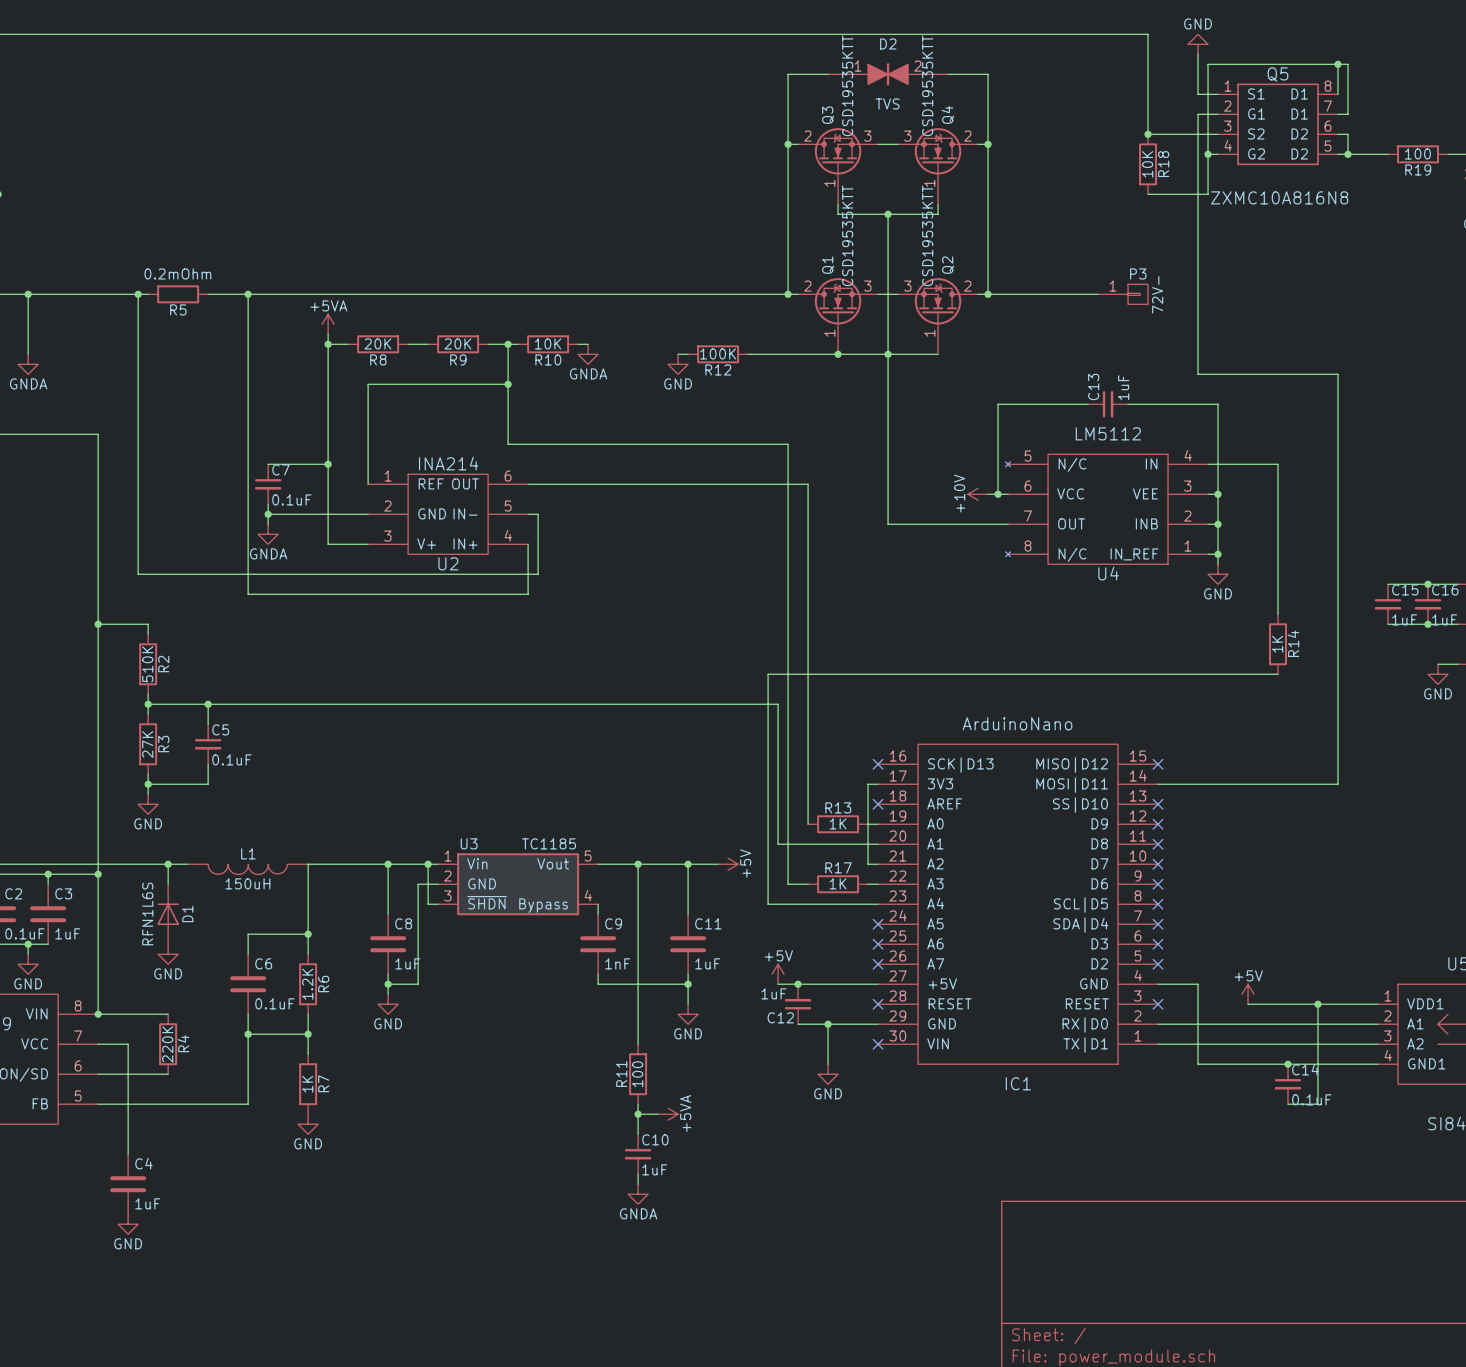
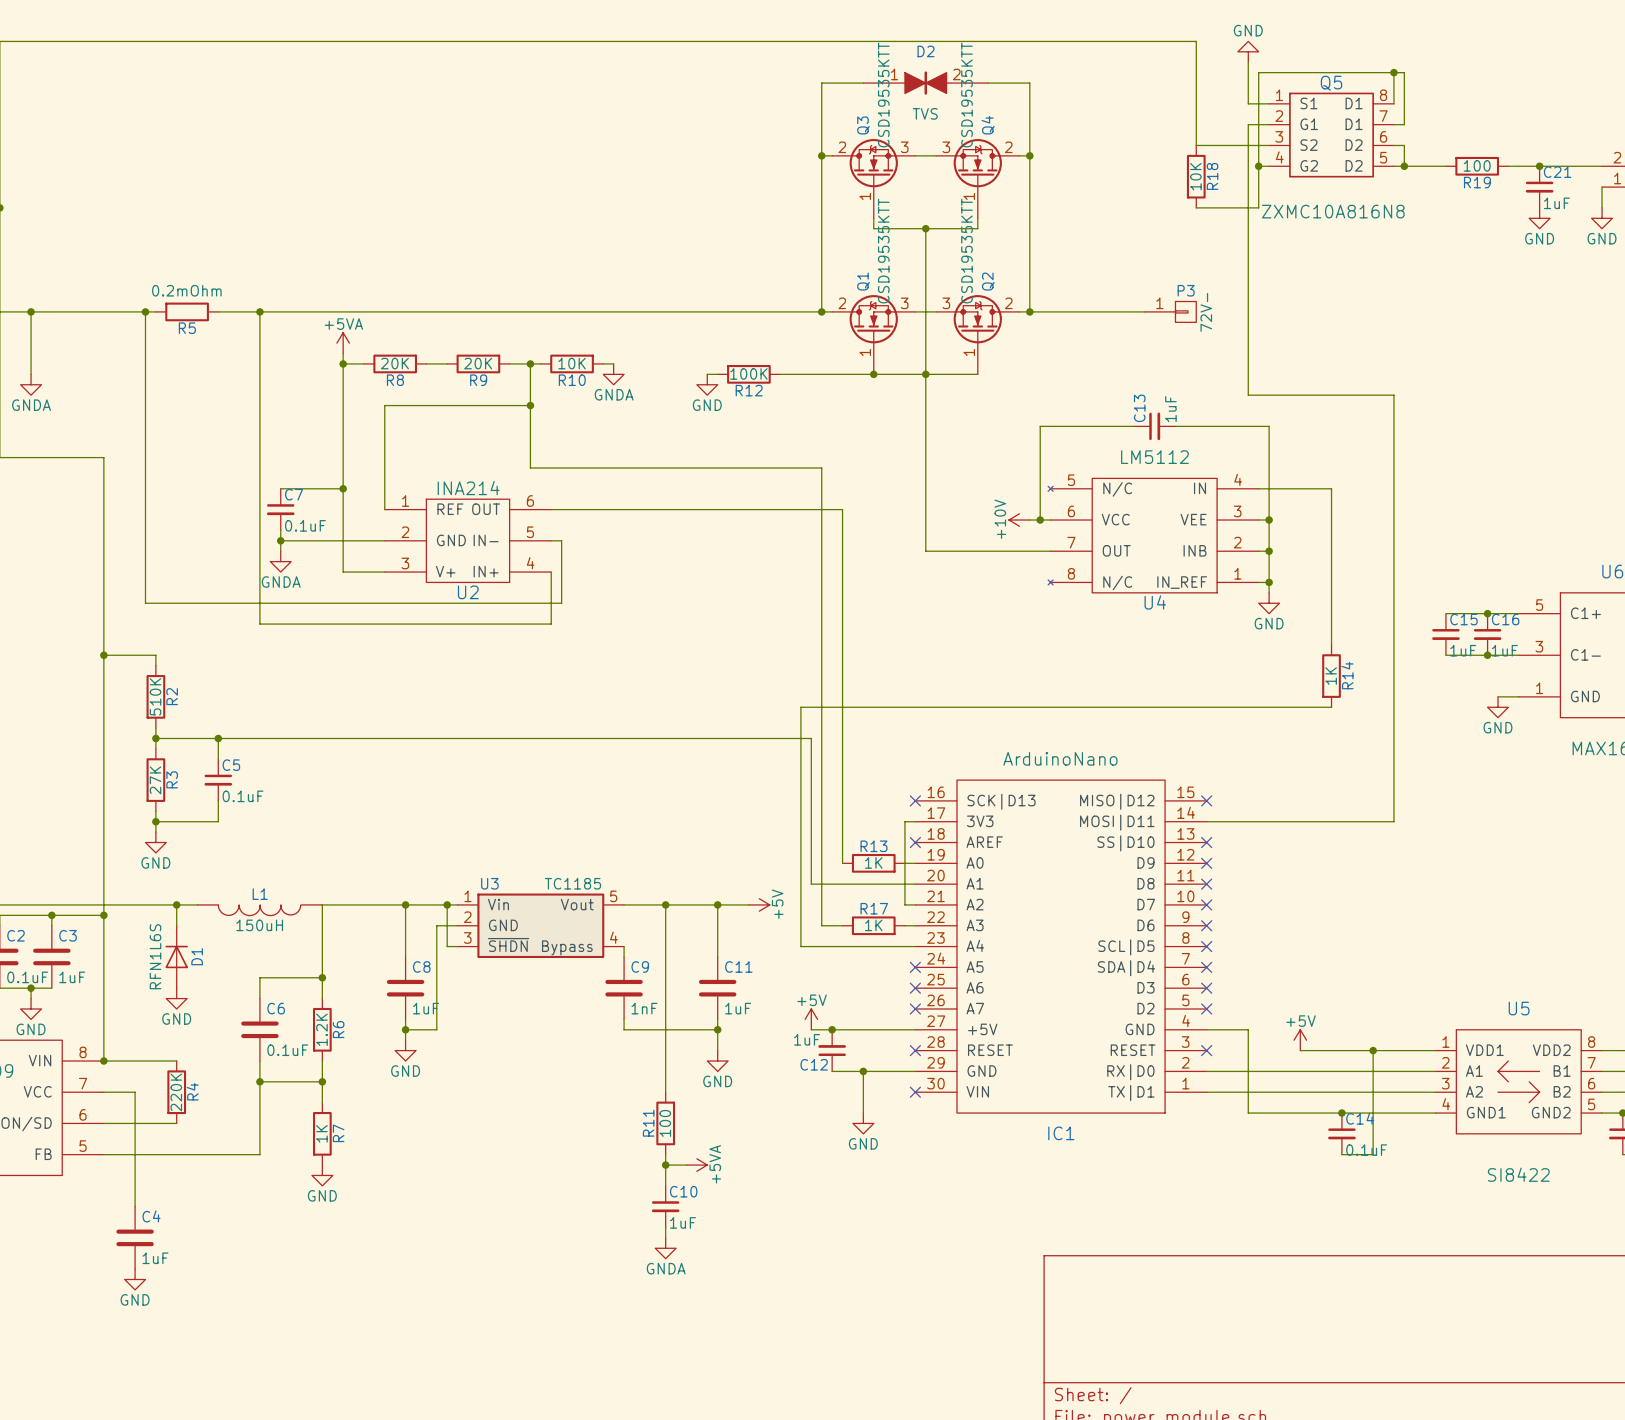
junction: (1148, 134) -> none

